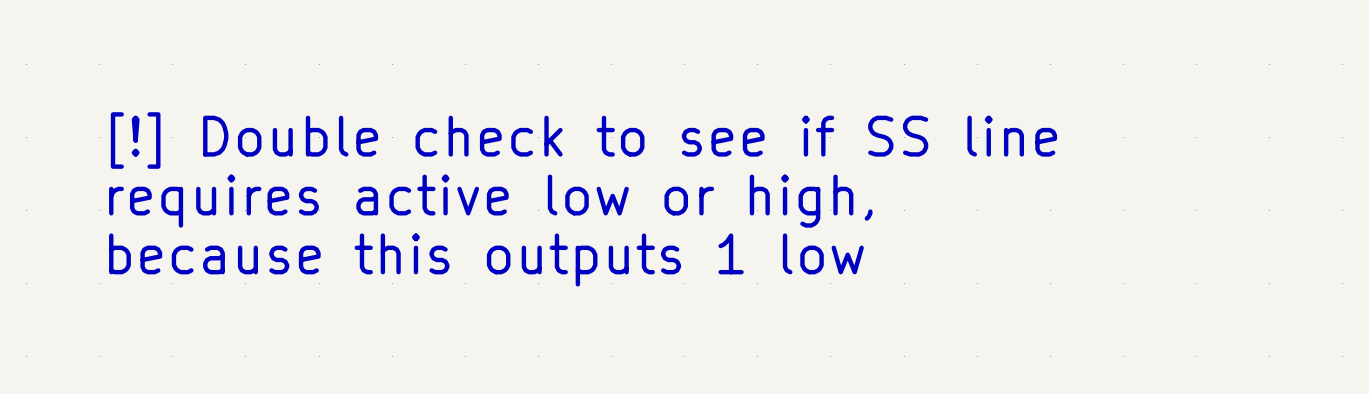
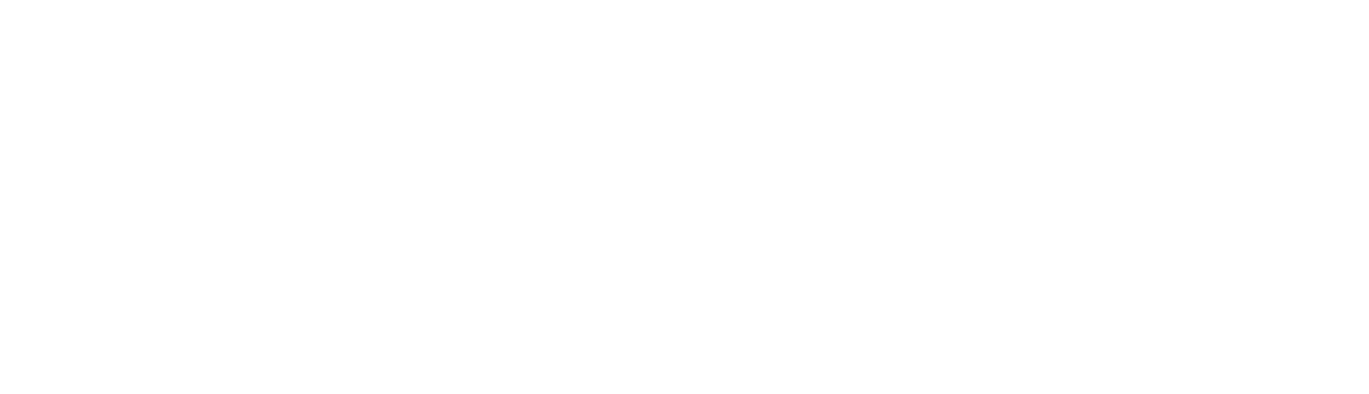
text: [!] Double check to see if SS line (583, 140) -> none
text: requires active low or high, (490, 201) -> none
text: because this outputs 1 low (486, 259) -> none

